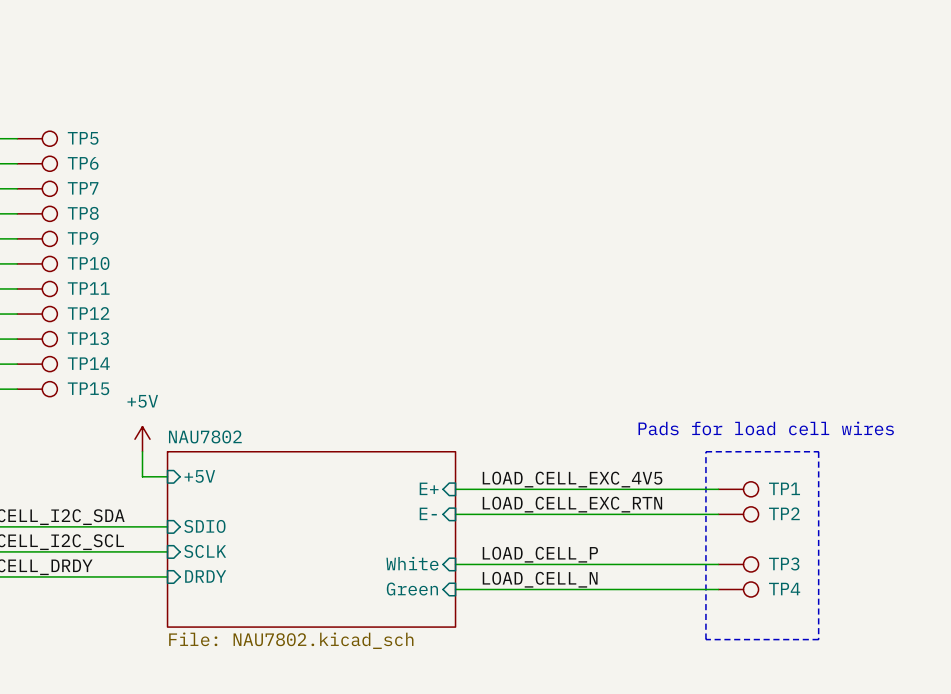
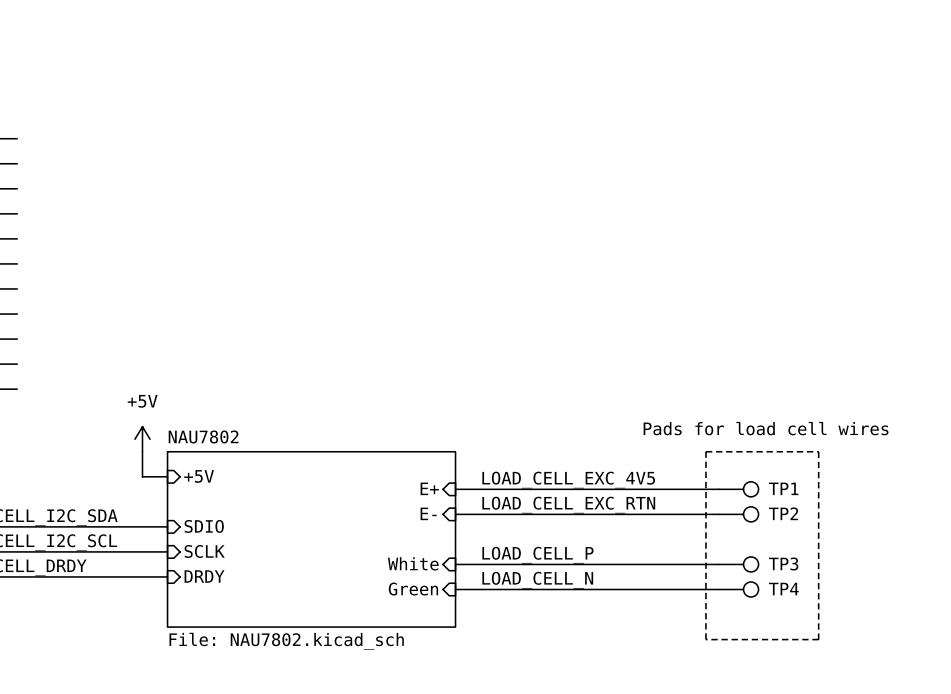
TP5: (37, 138) -> none
TP6: (37, 163) -> none
TP7: (37, 188) -> none
TP8: (37, 213) -> none
TP9: (37, 238) -> none
TP10: (37, 263) -> none
TP11: (37, 288) -> none
TP12: (37, 314) -> none
TP13: (37, 339) -> none
TP14: (37, 364) -> none
TP15: (37, 389) -> none

